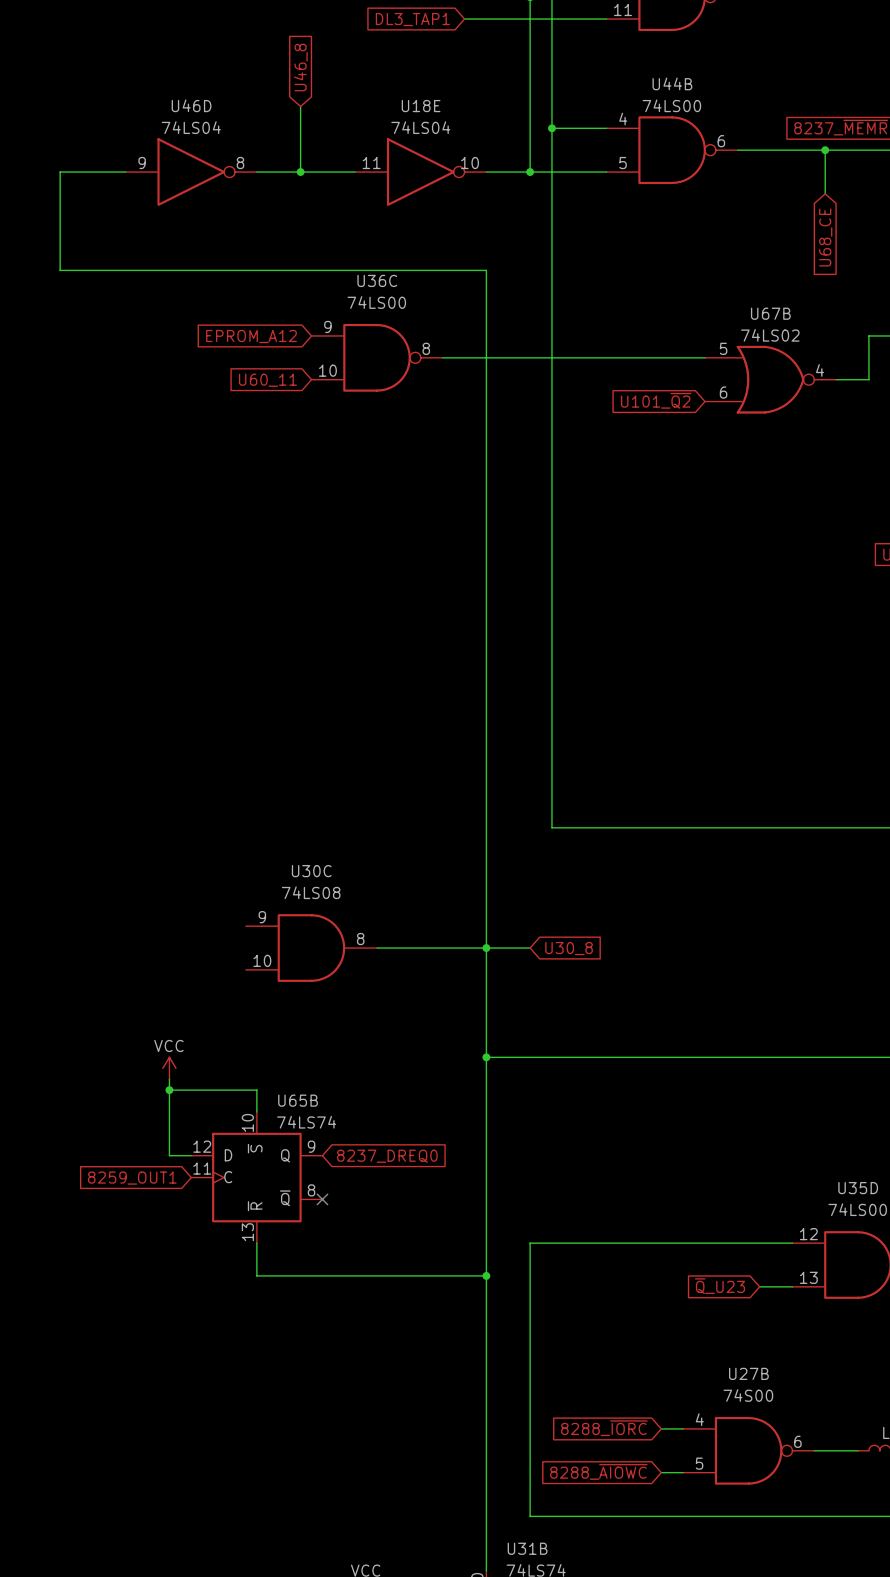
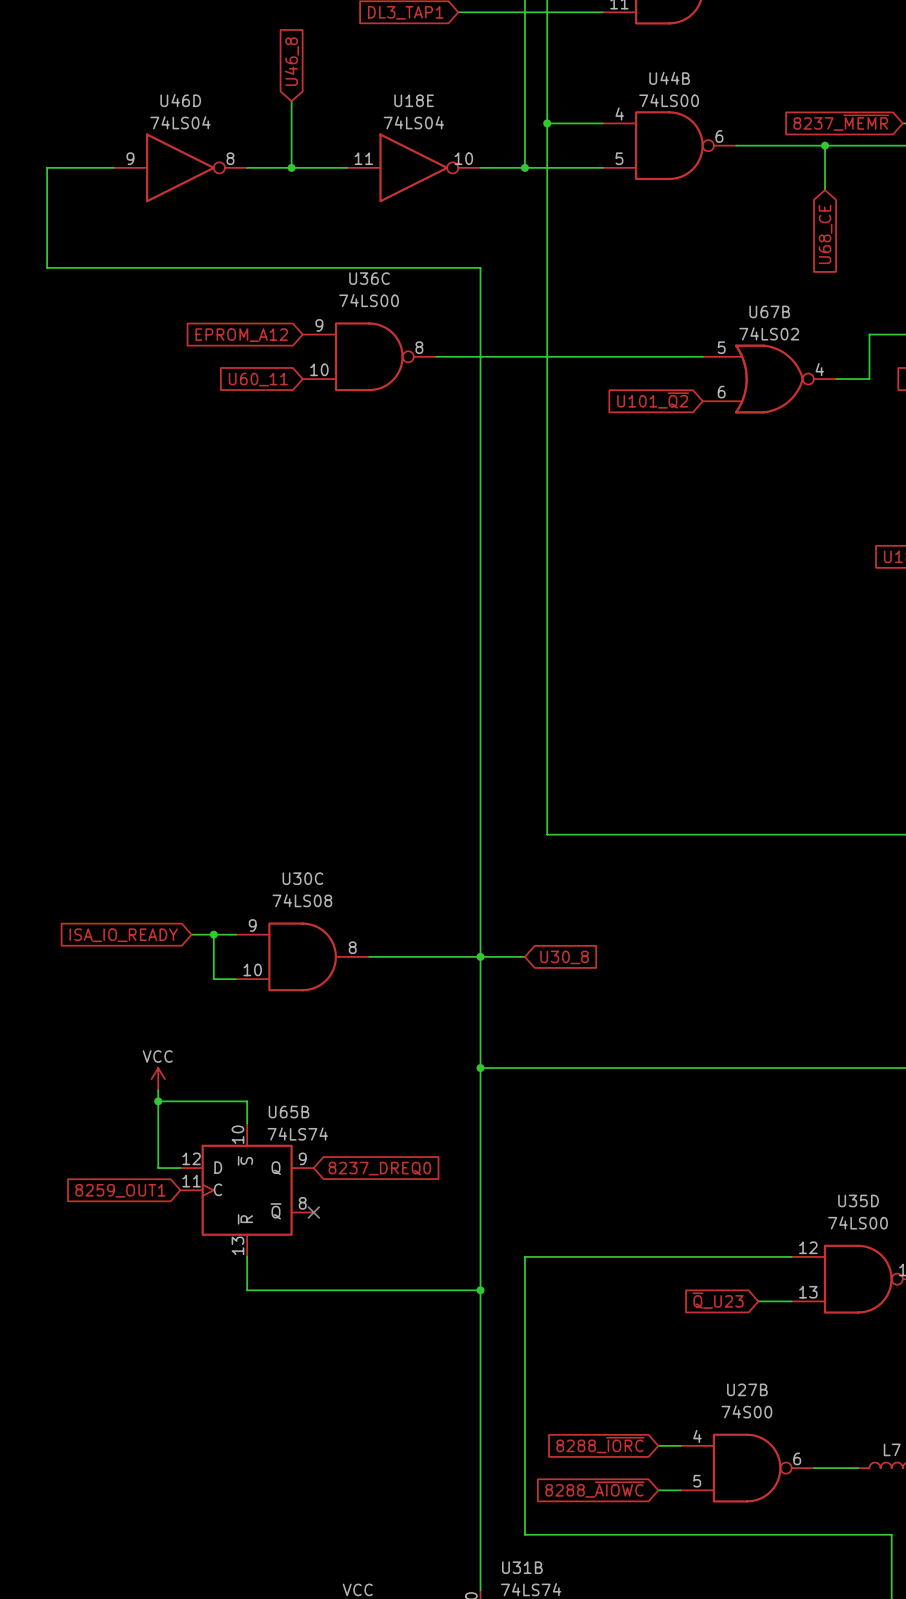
global label: none -> ISA_IO_READY (123, 935)
wire: none -> (191, 934) (236, 934)
wire: none -> (213, 934) (213, 979) (236, 979)
junction: none -> (213, 934)

